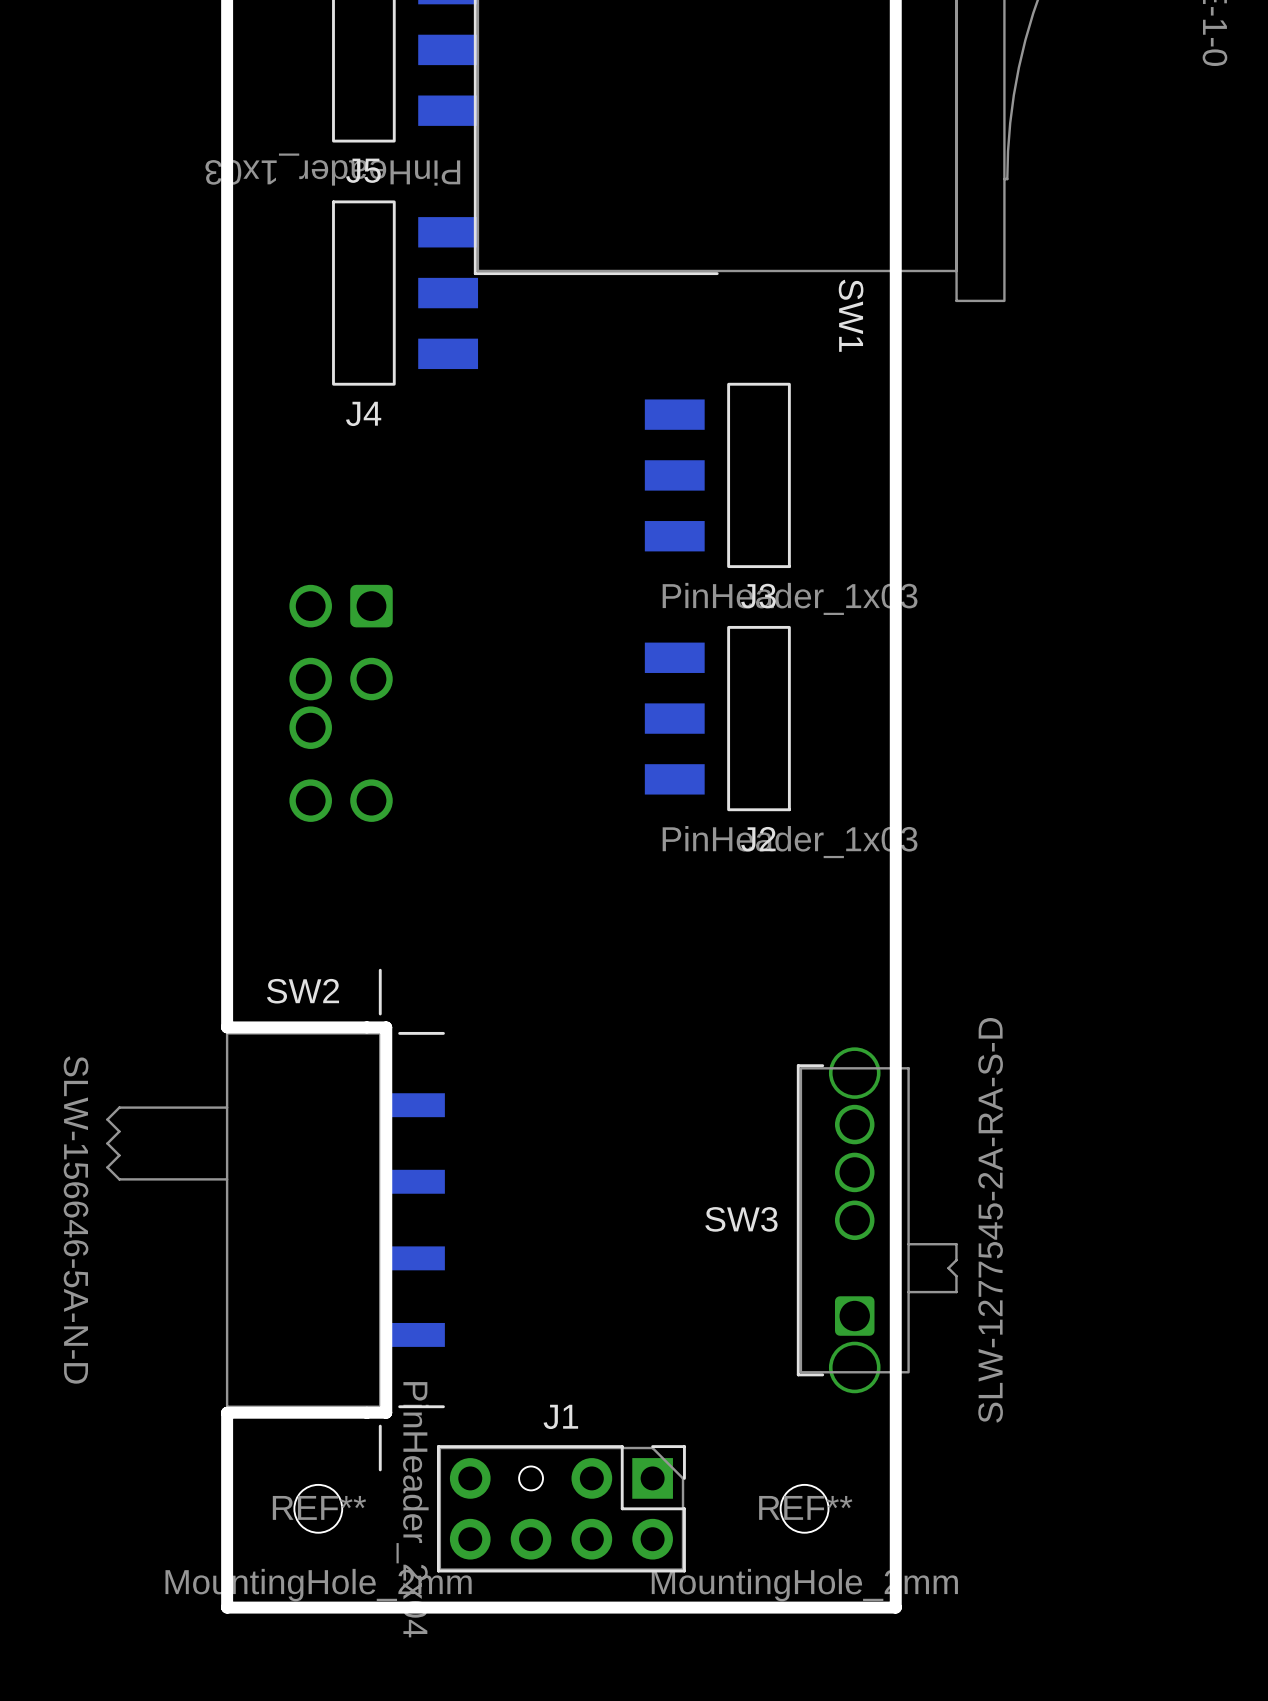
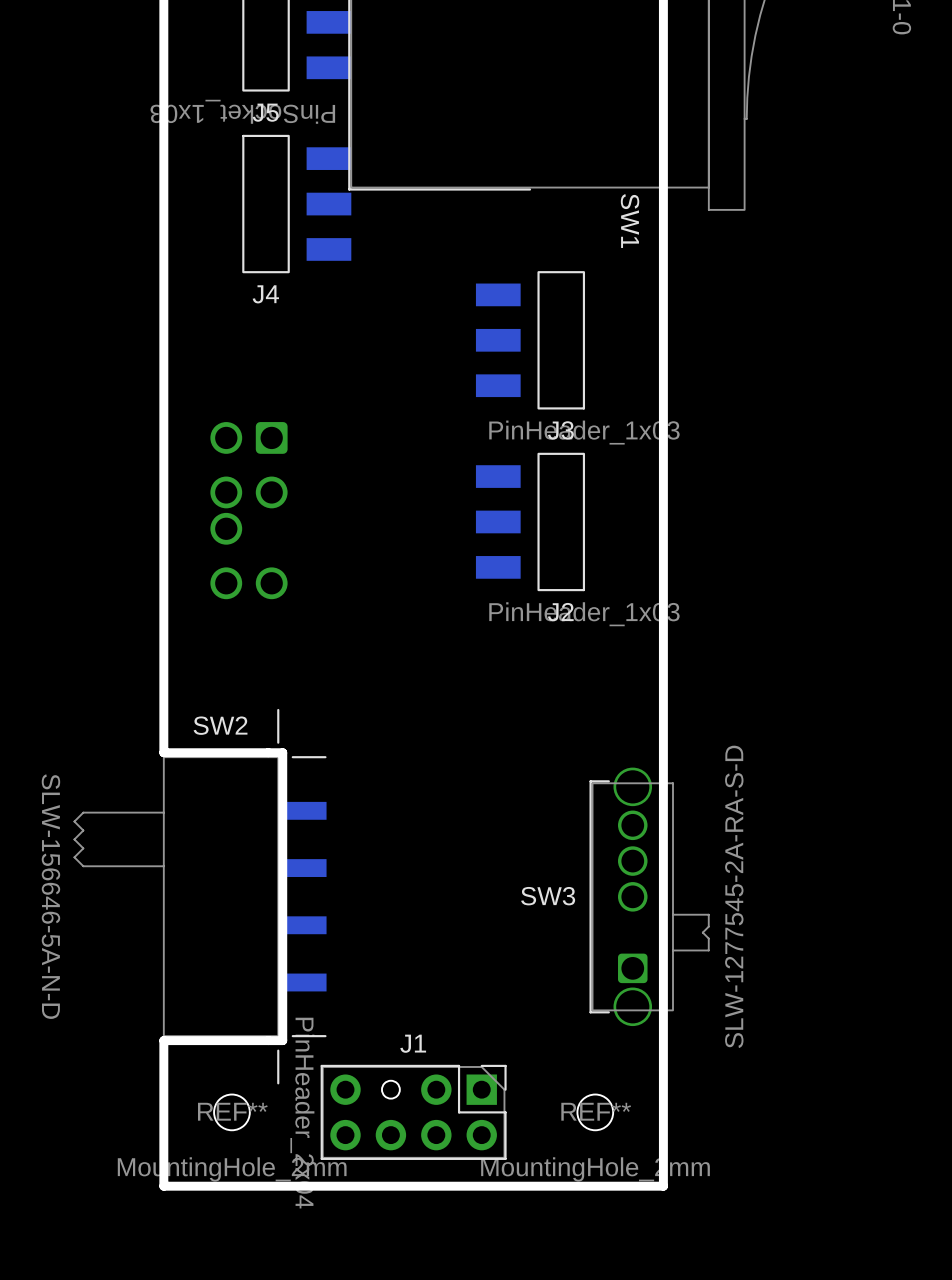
J4 value: PinHeader_1x03 (332, 169) -> PinSocket_1x03 (242, 111)

